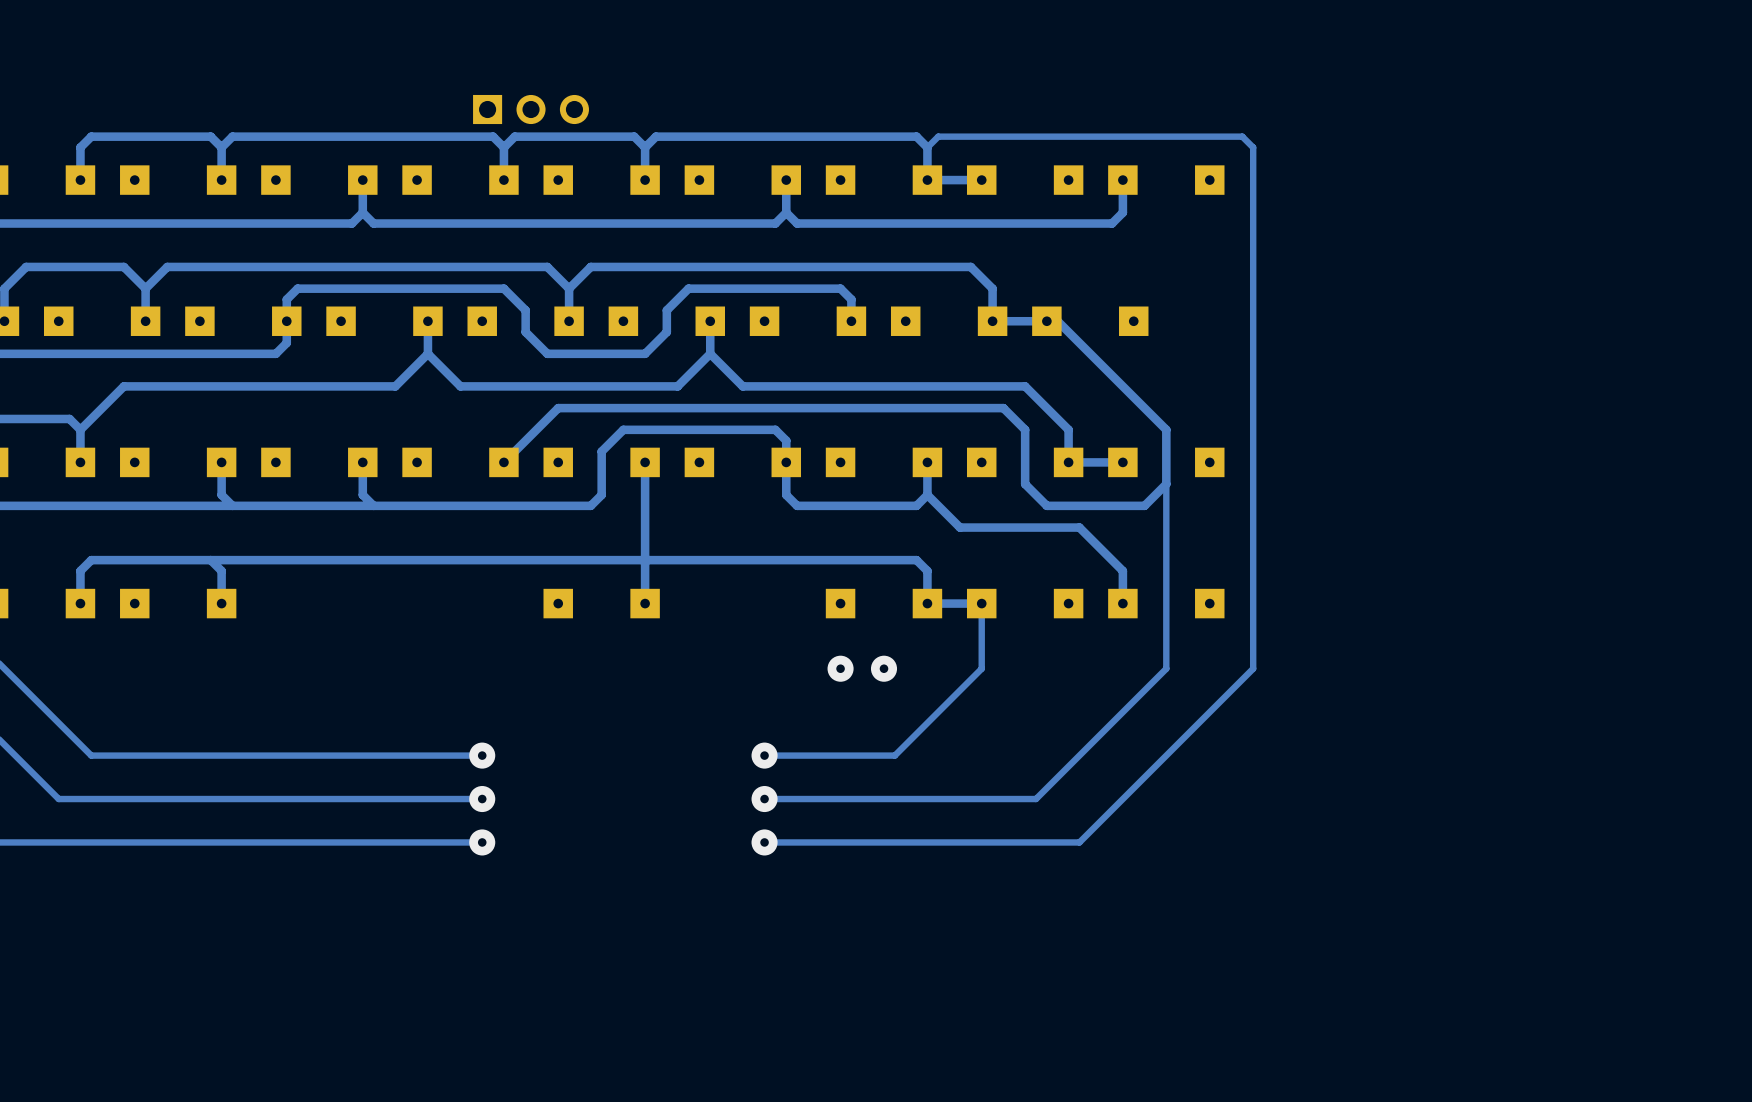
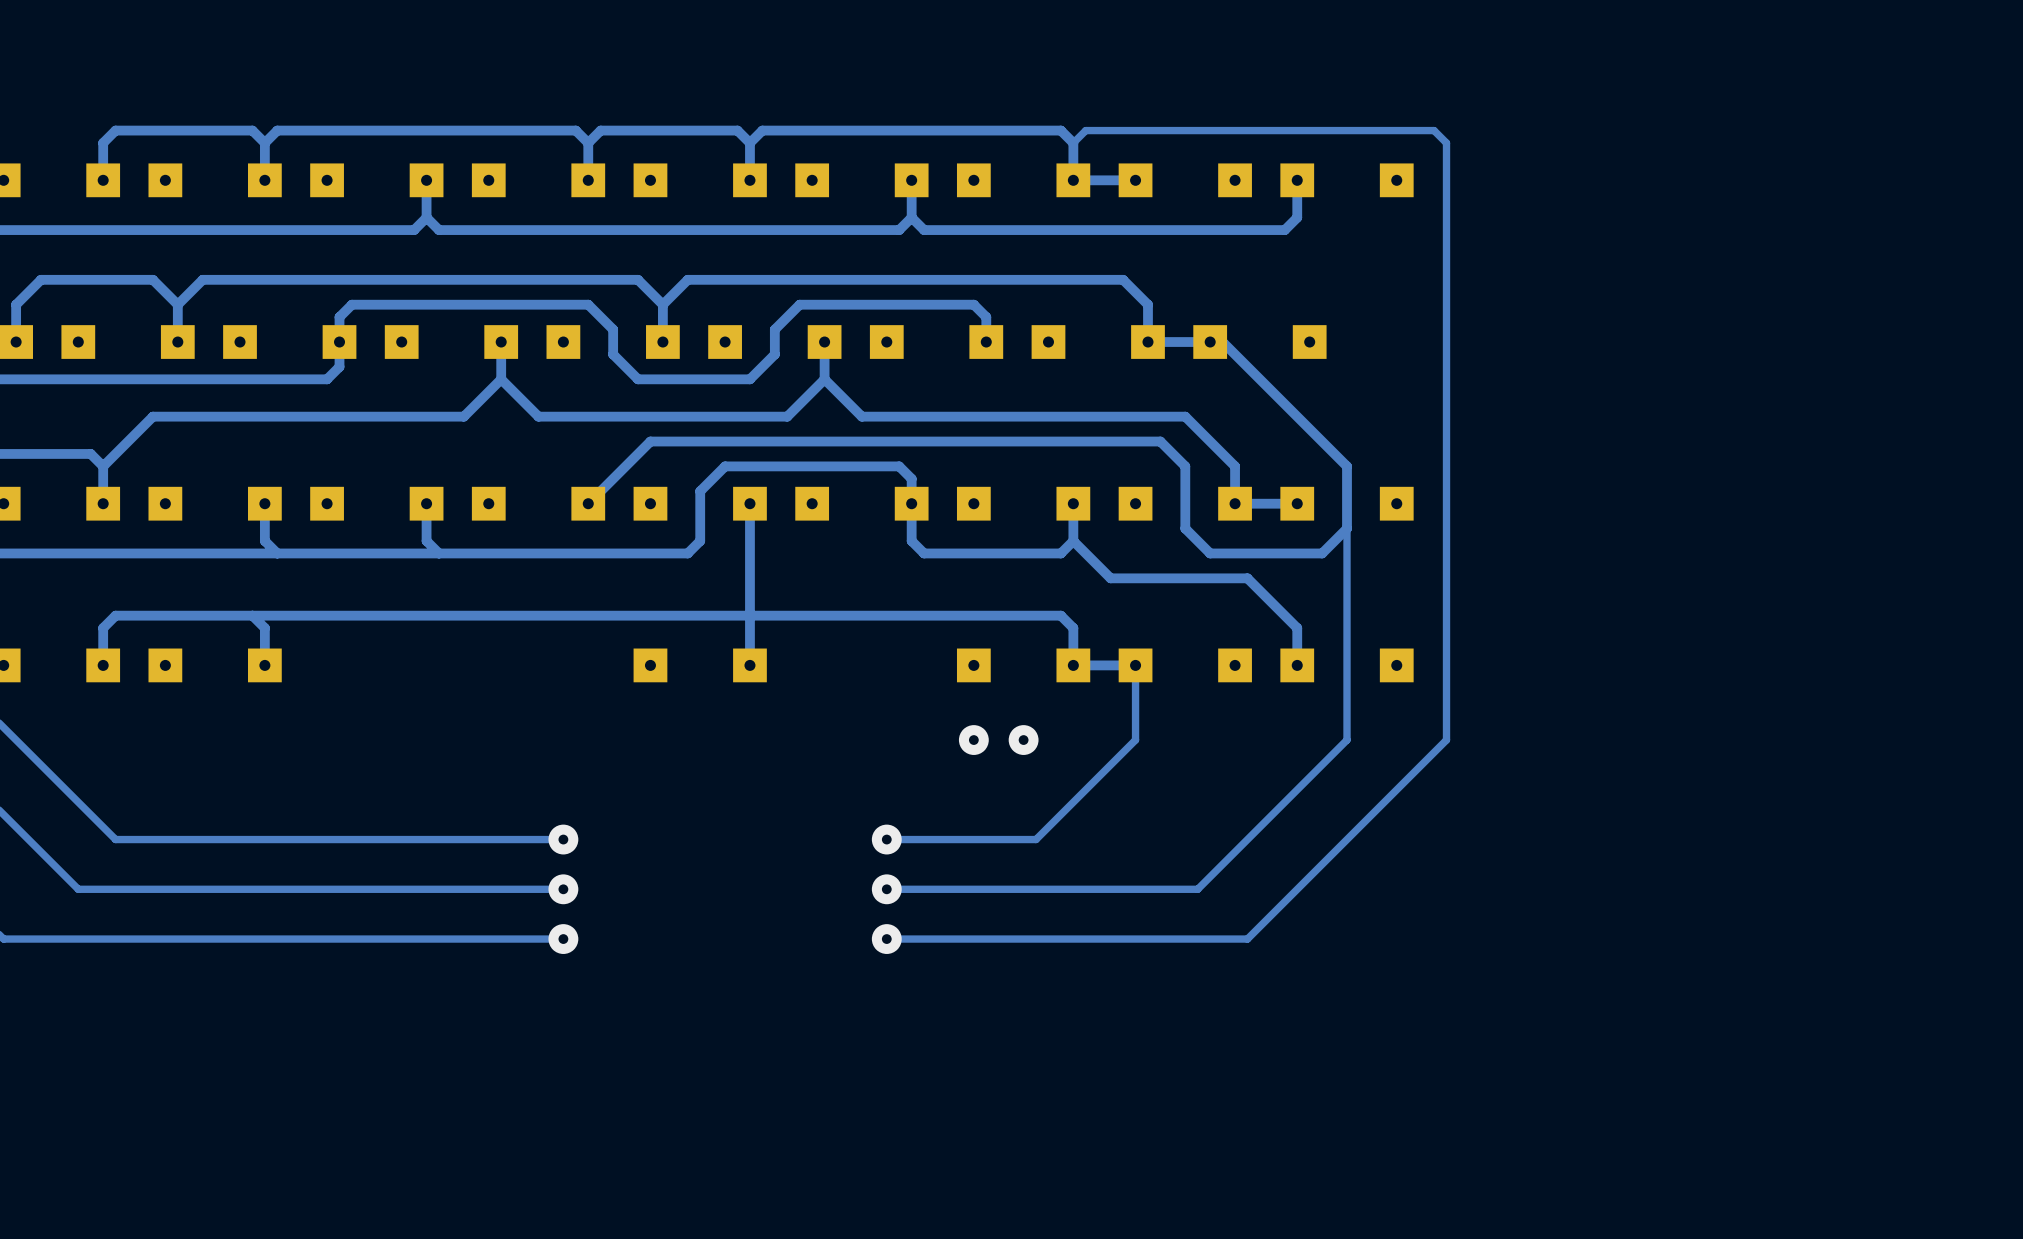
part: (531, 109) -> none

